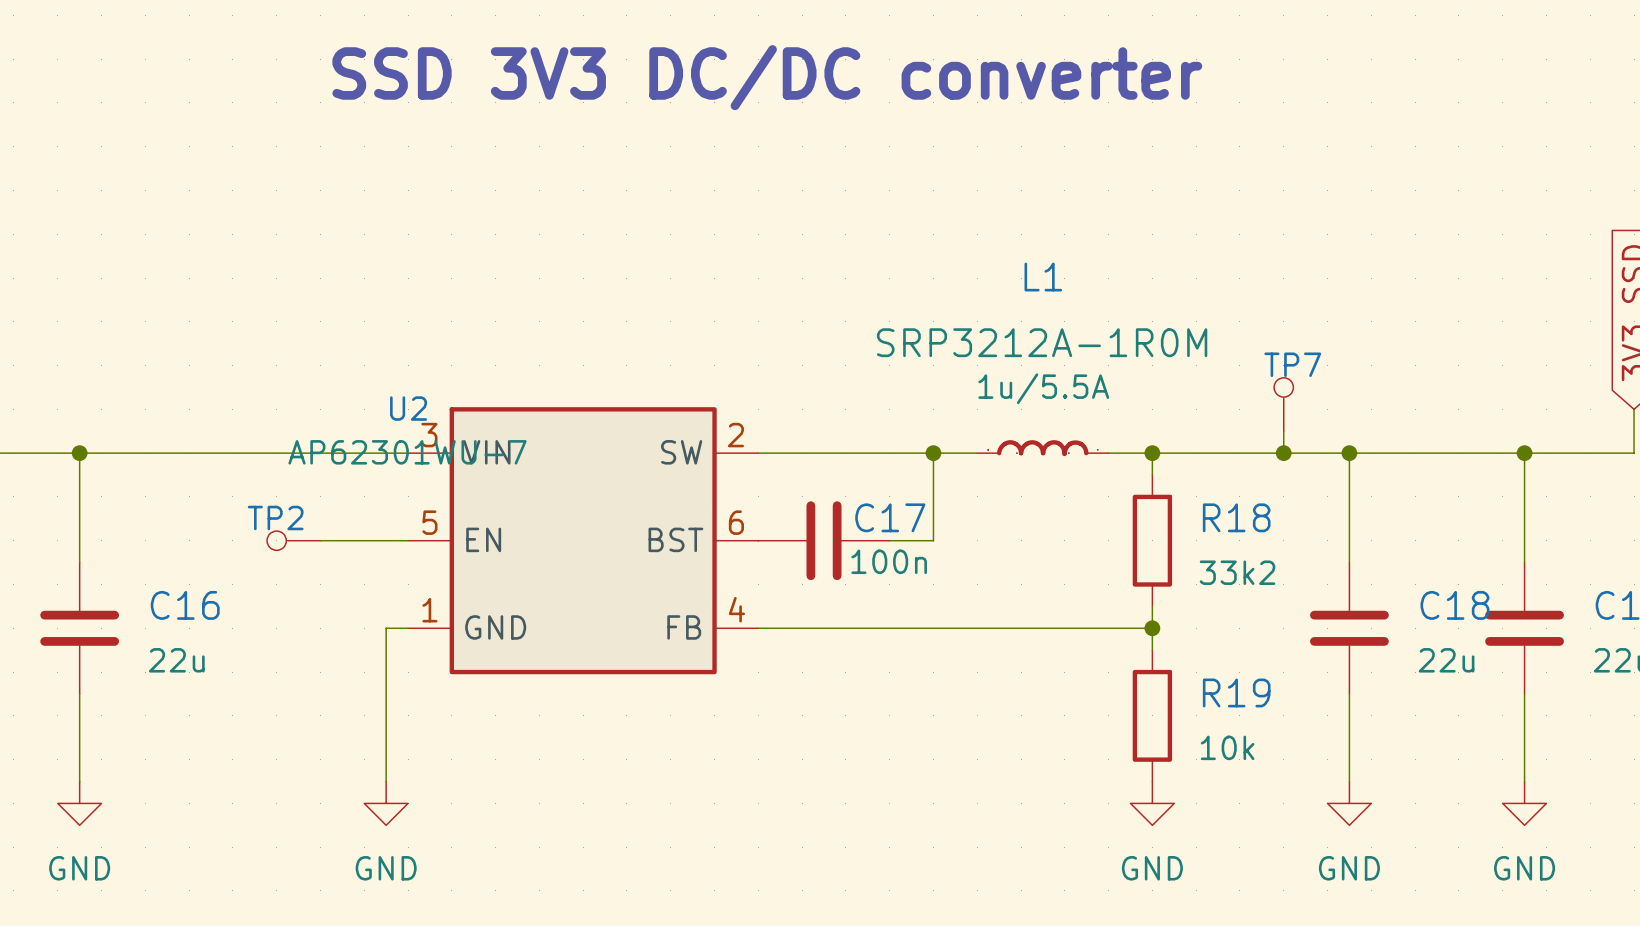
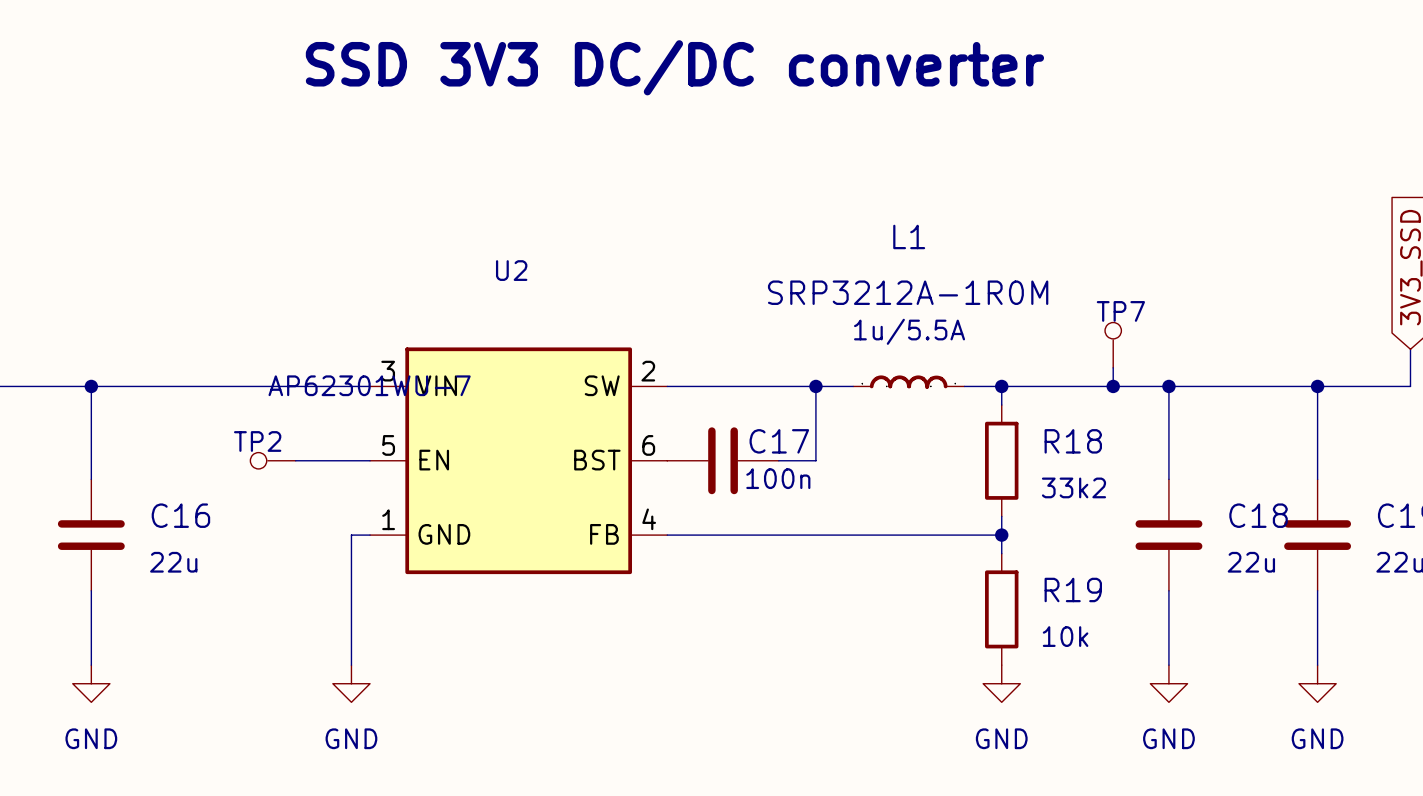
U2 name position: U2 (408, 408) -> U2 (511, 270)

